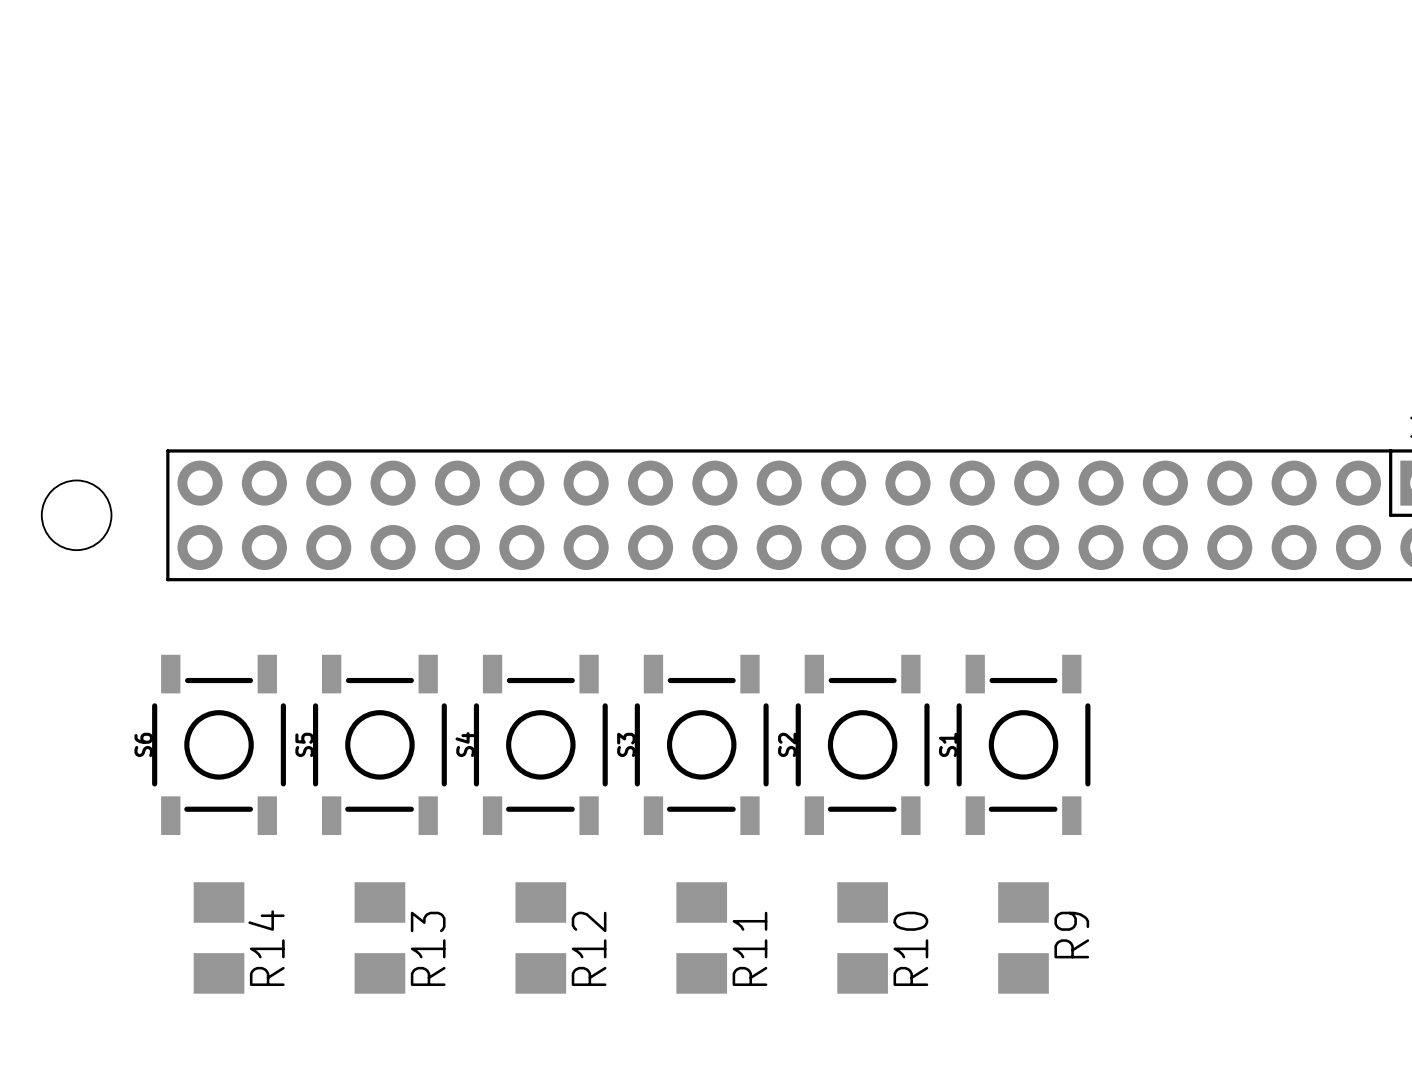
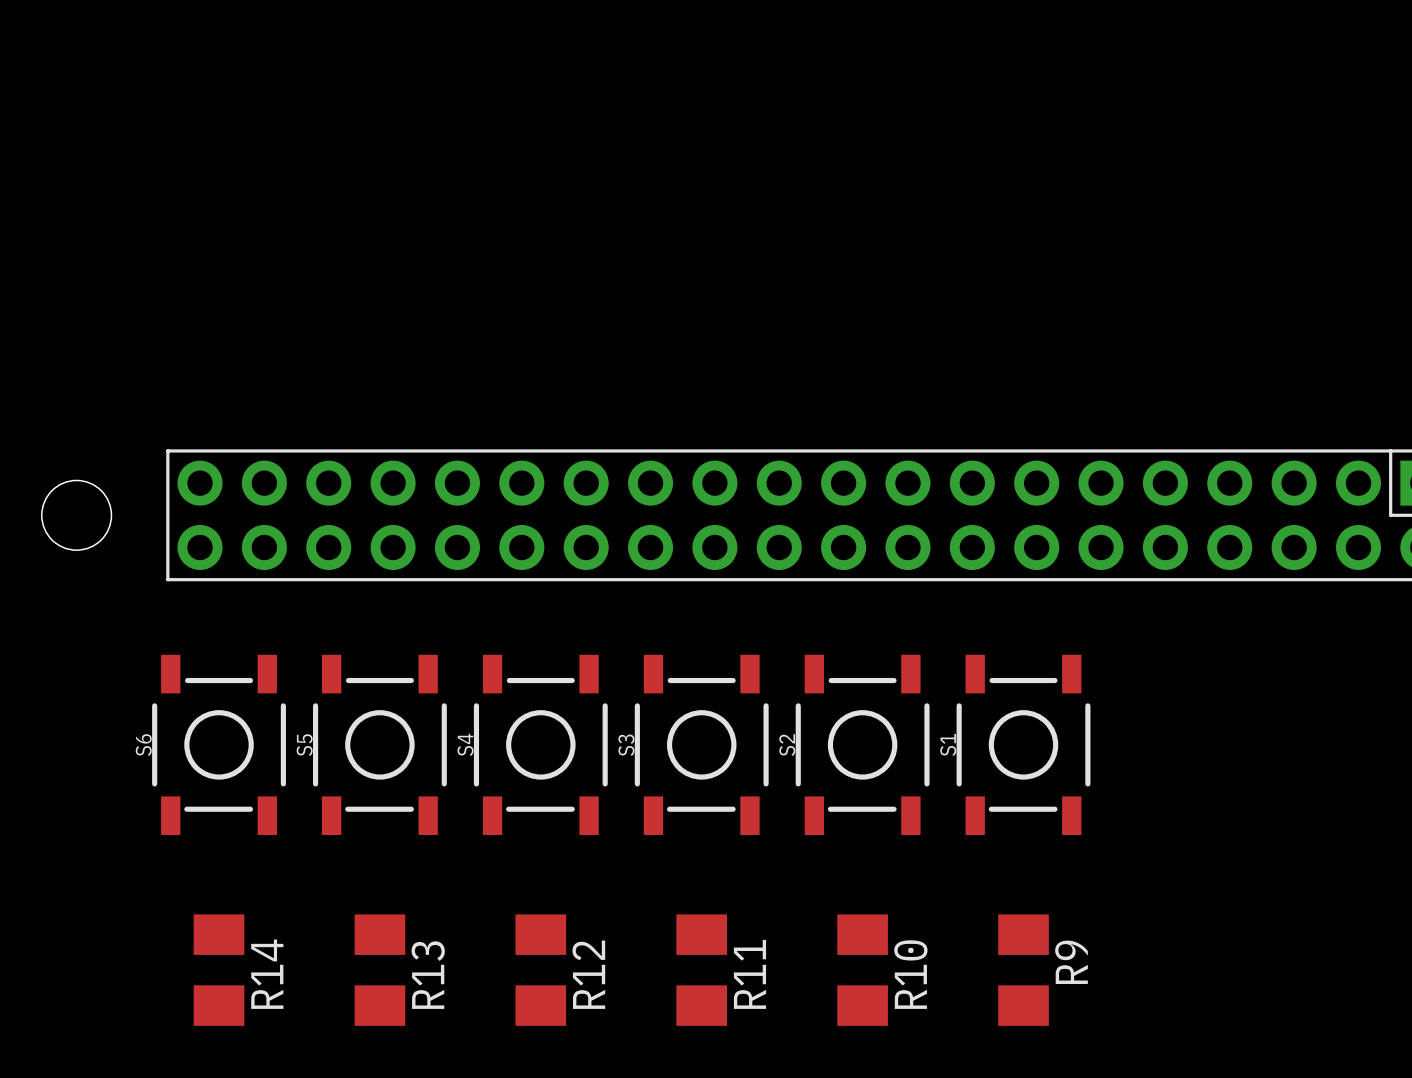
R14 position: (219, 937) -> (219, 970)
R13 position: (379, 937) -> (379, 970)
R12 position: (540, 937) -> (540, 970)
R11 position: (701, 937) -> (701, 970)
R10 position: (862, 937) -> (862, 970)
R9 position: (1023, 937) -> (1023, 970)

